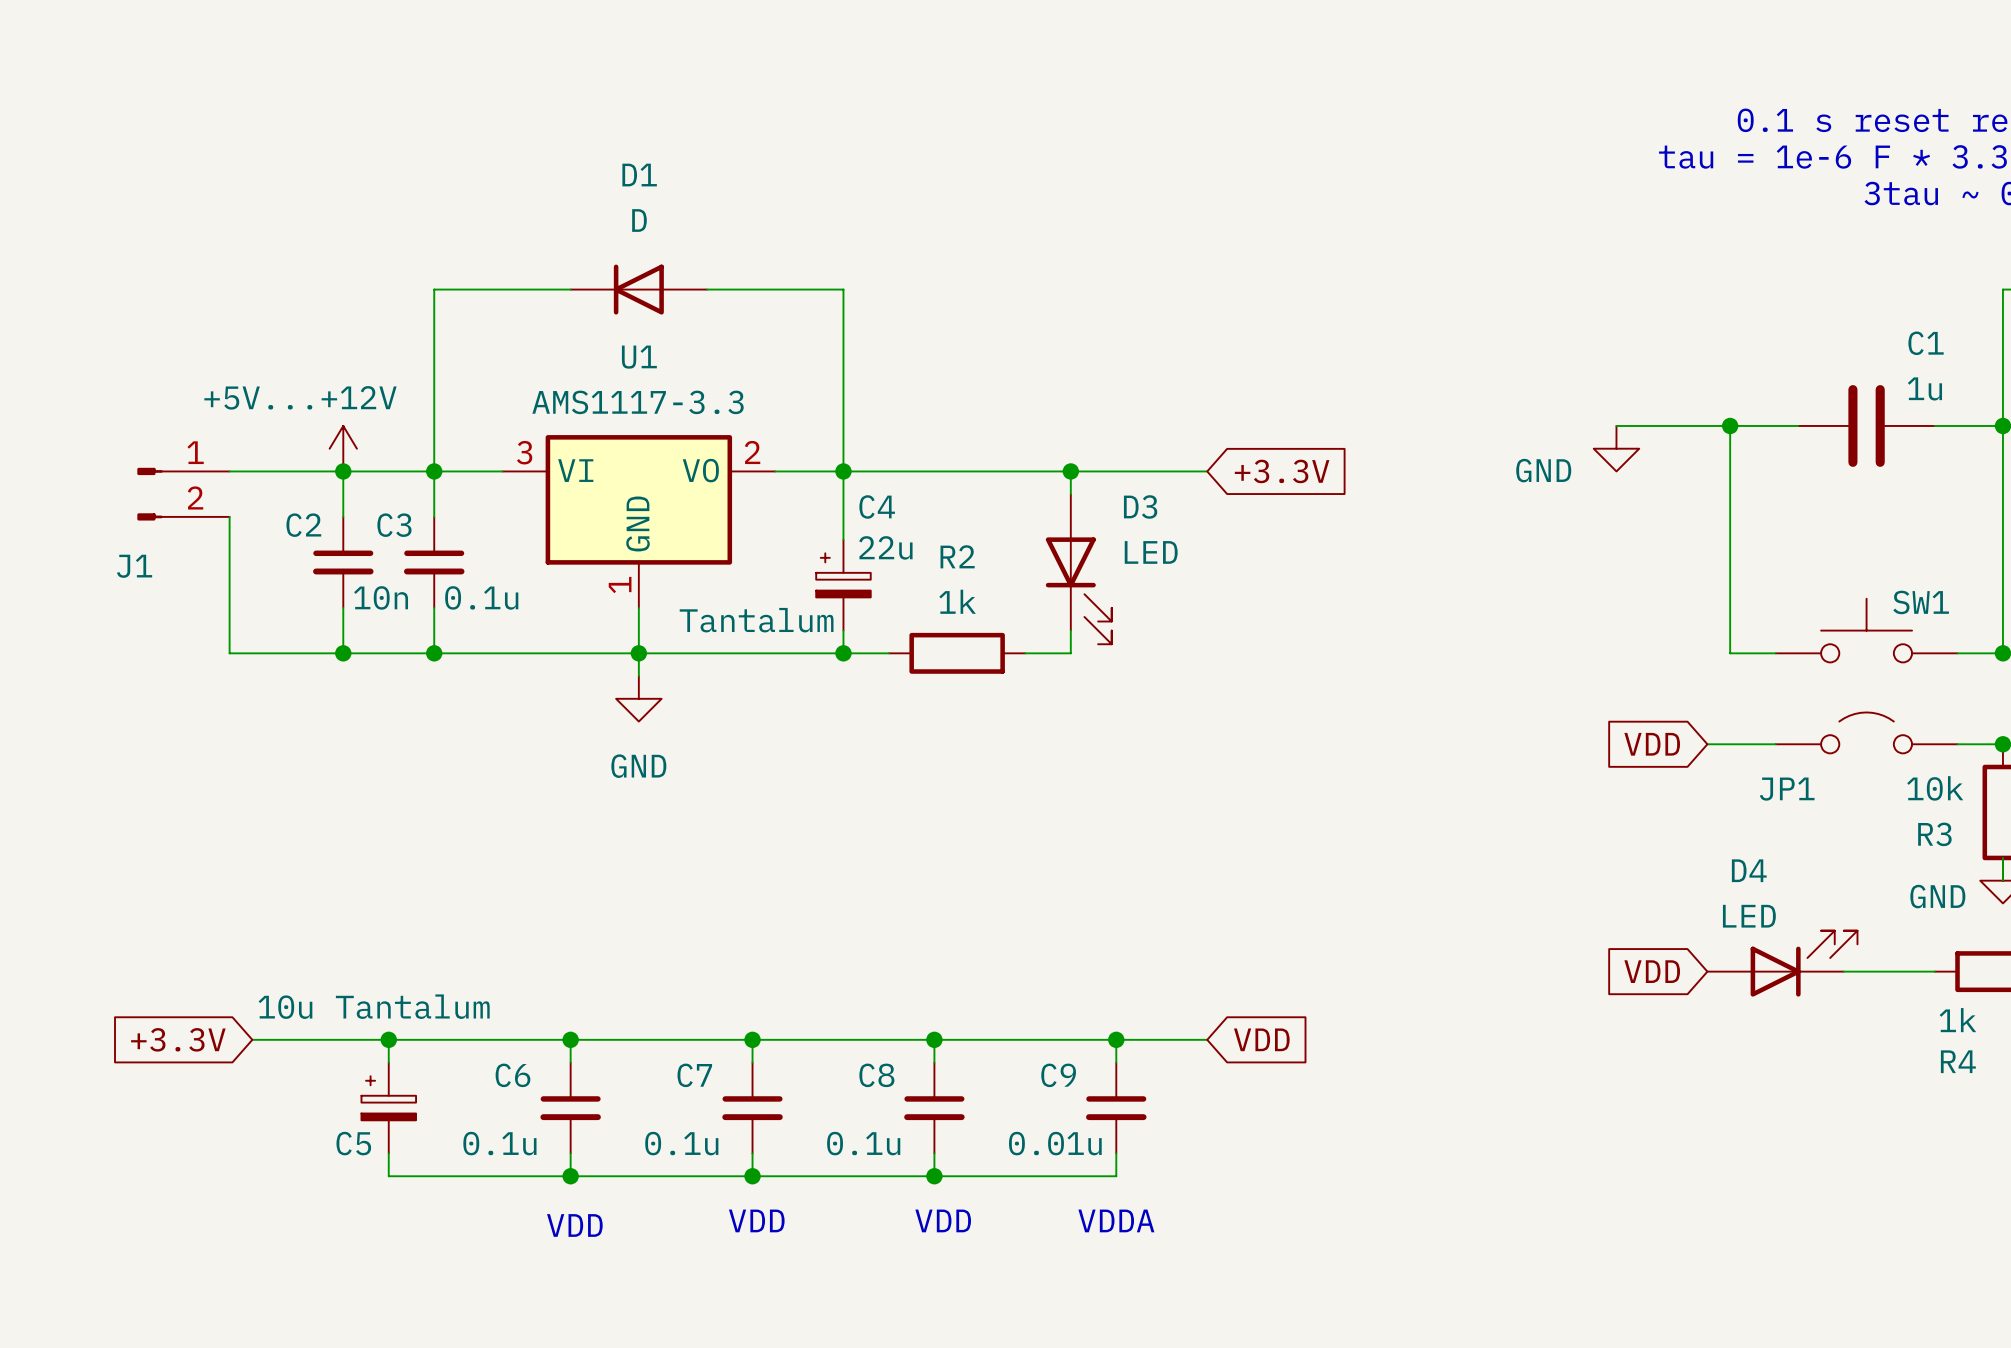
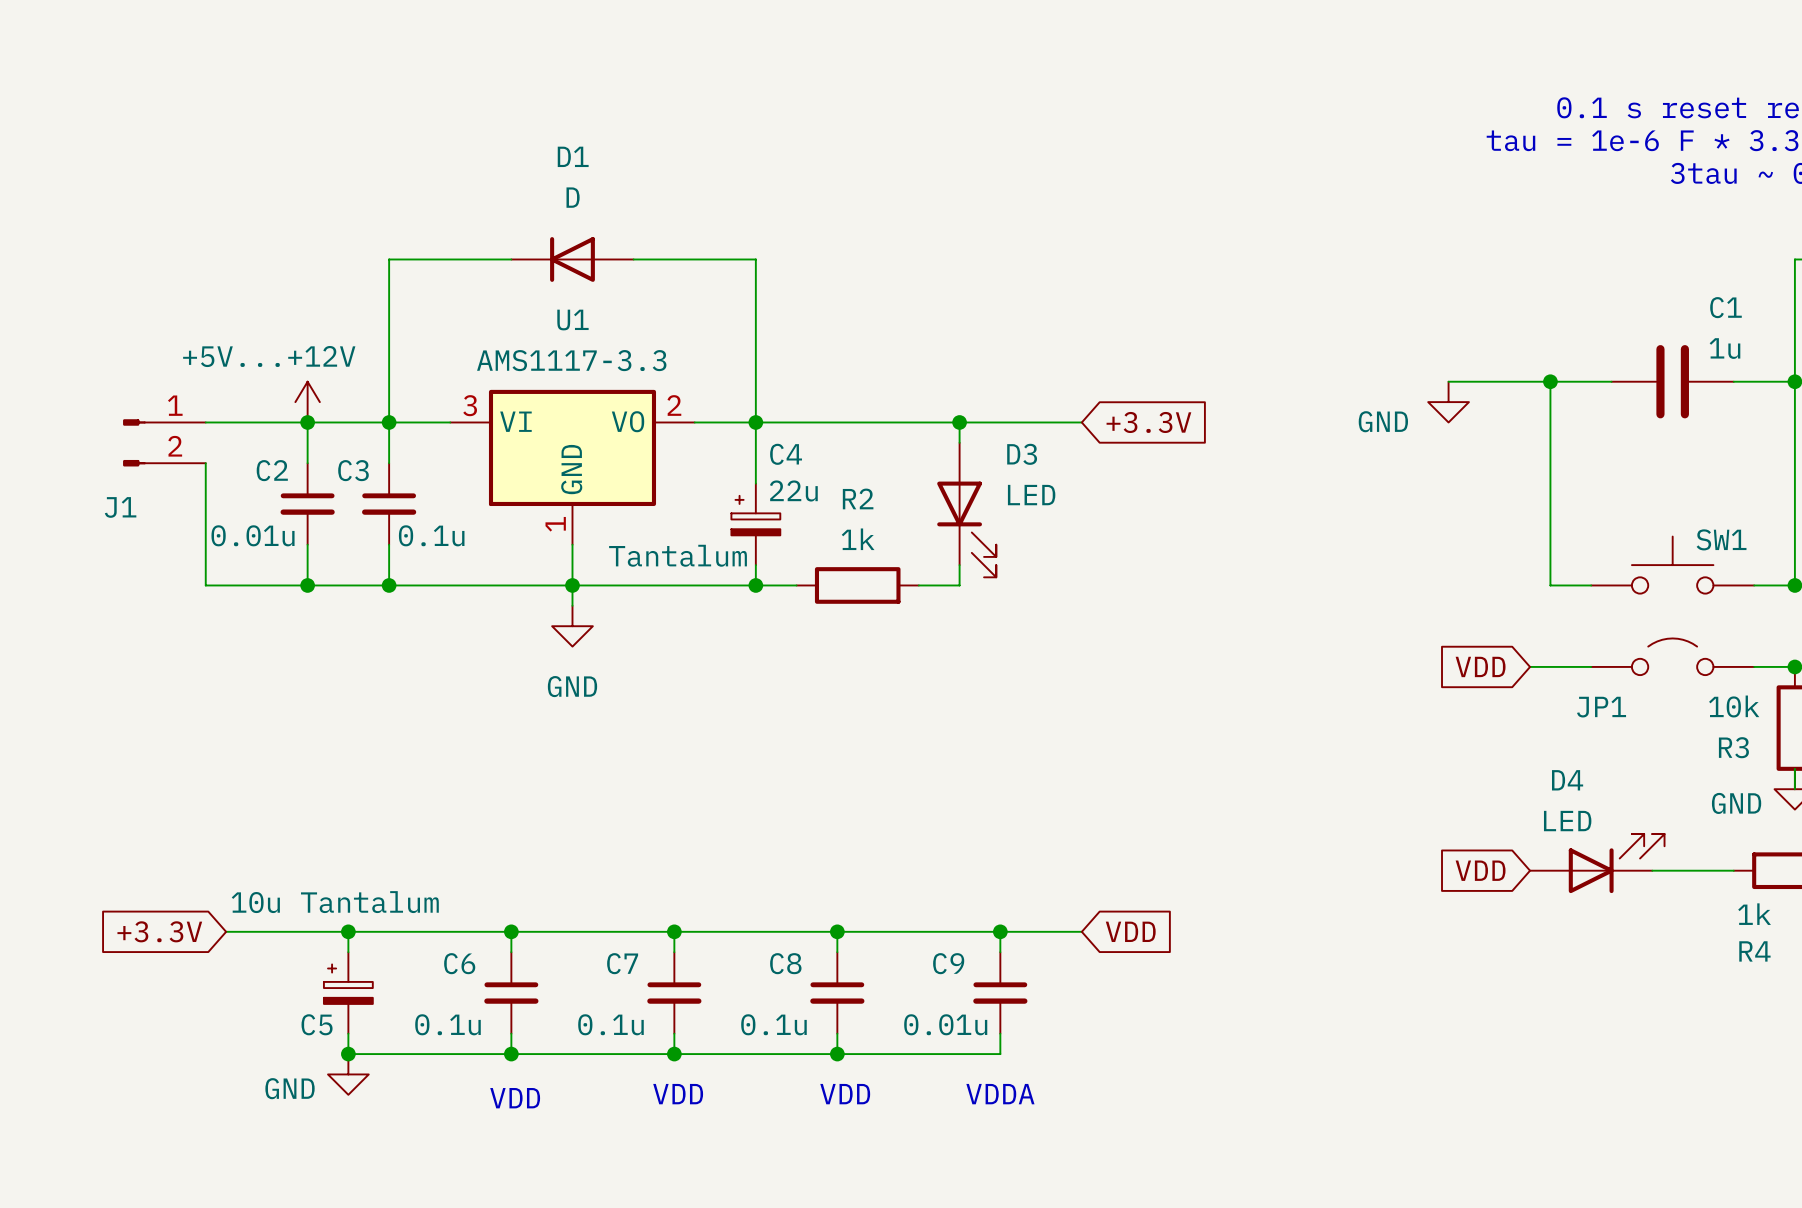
C2 value: 10n (381, 597) -> 0.01u (253, 535)
junction: none -> (348, 1054)
power symbol: none -> GND (348, 1074)

